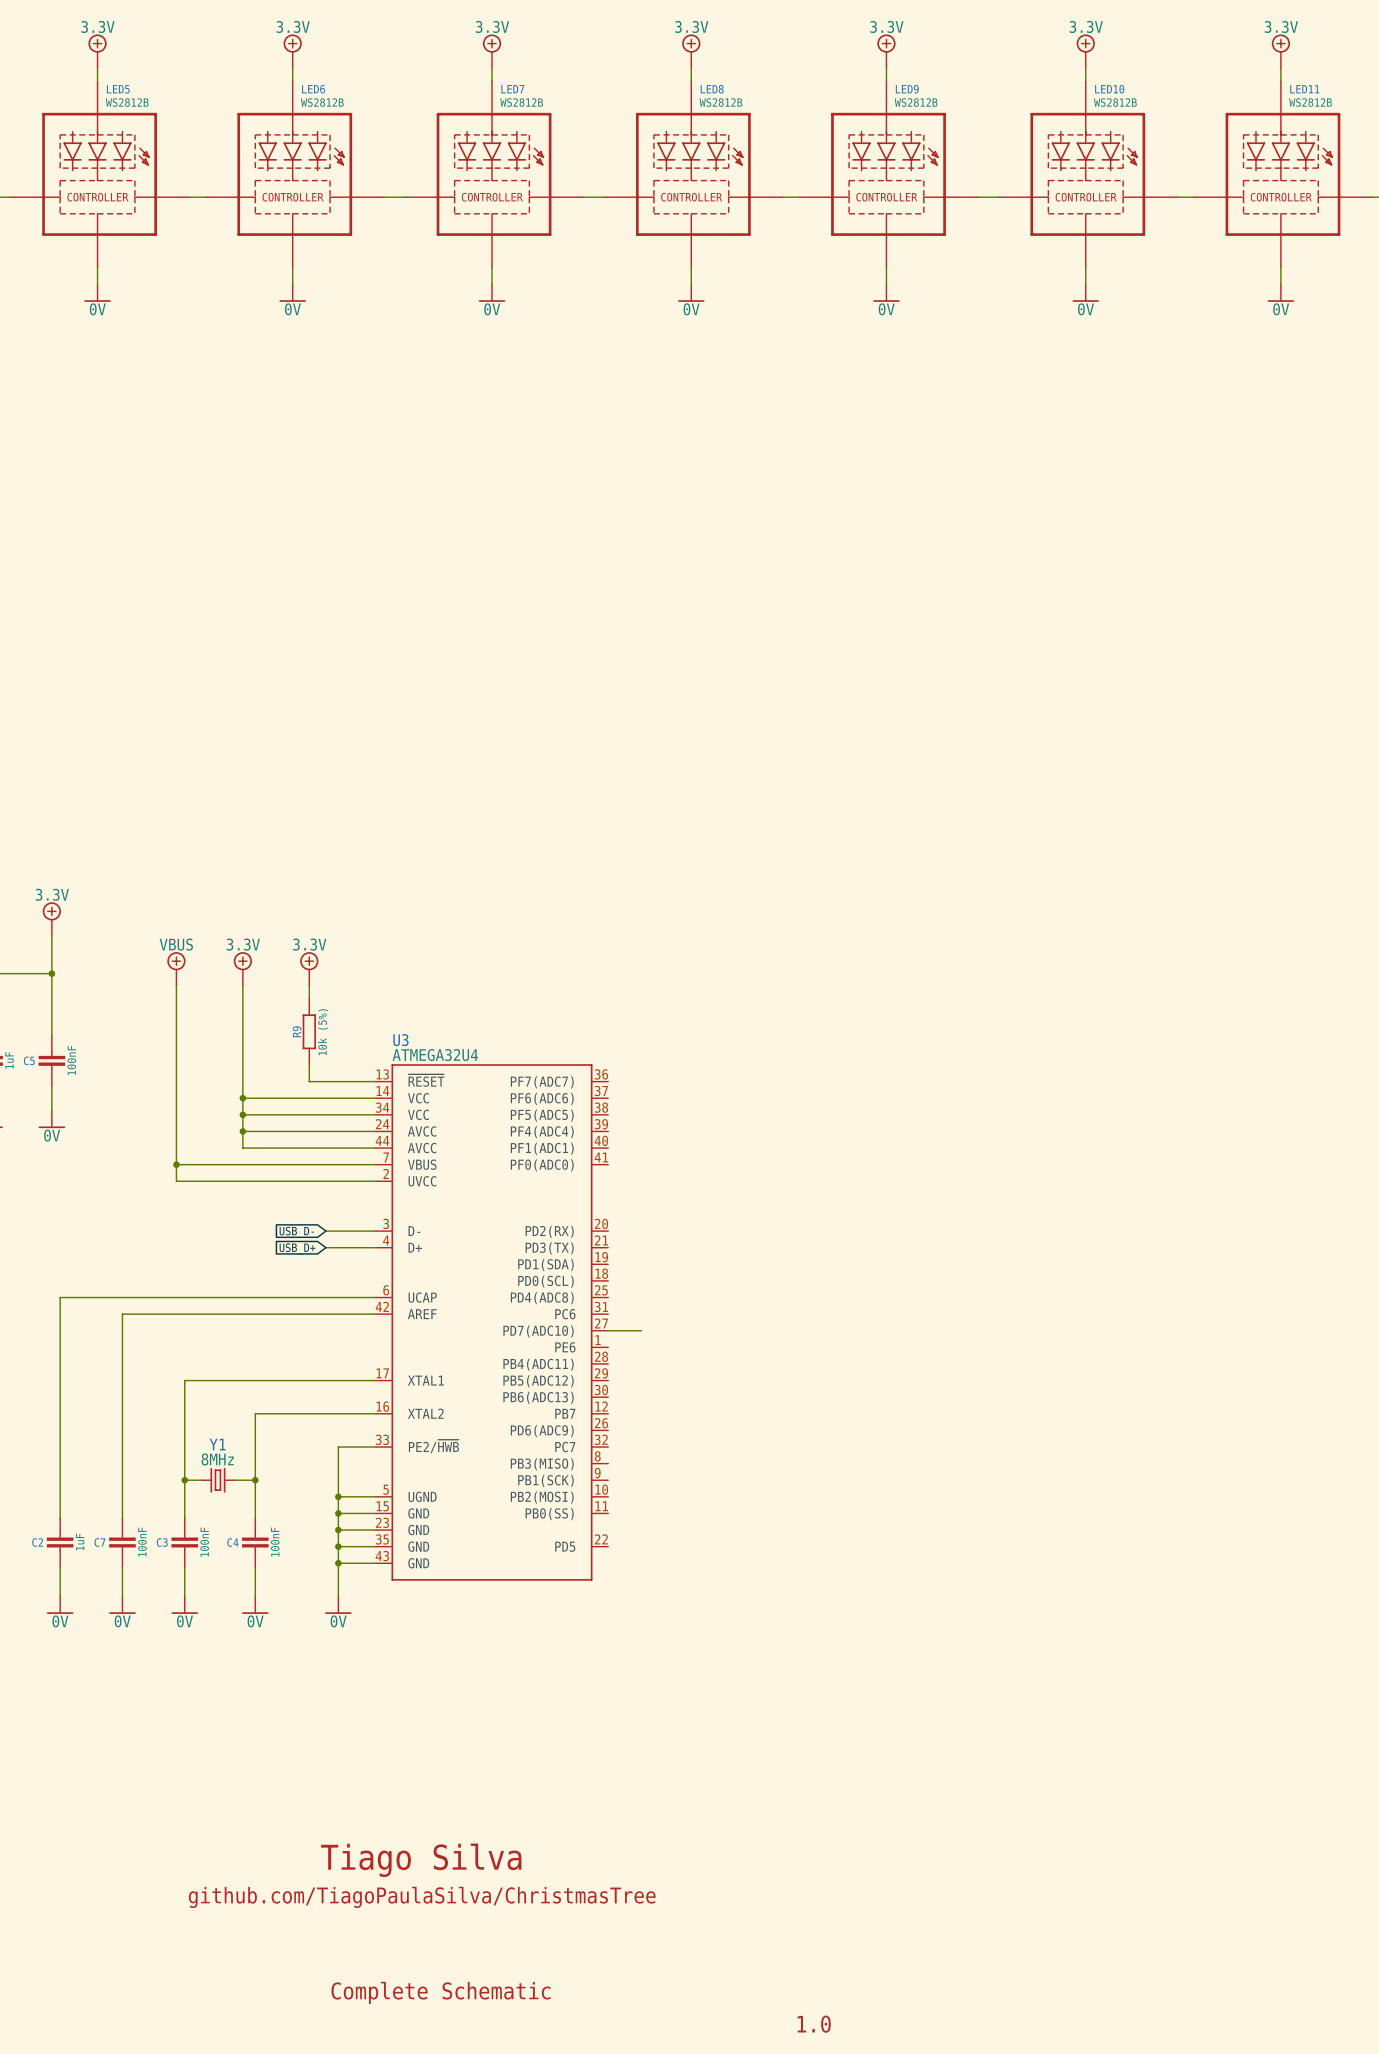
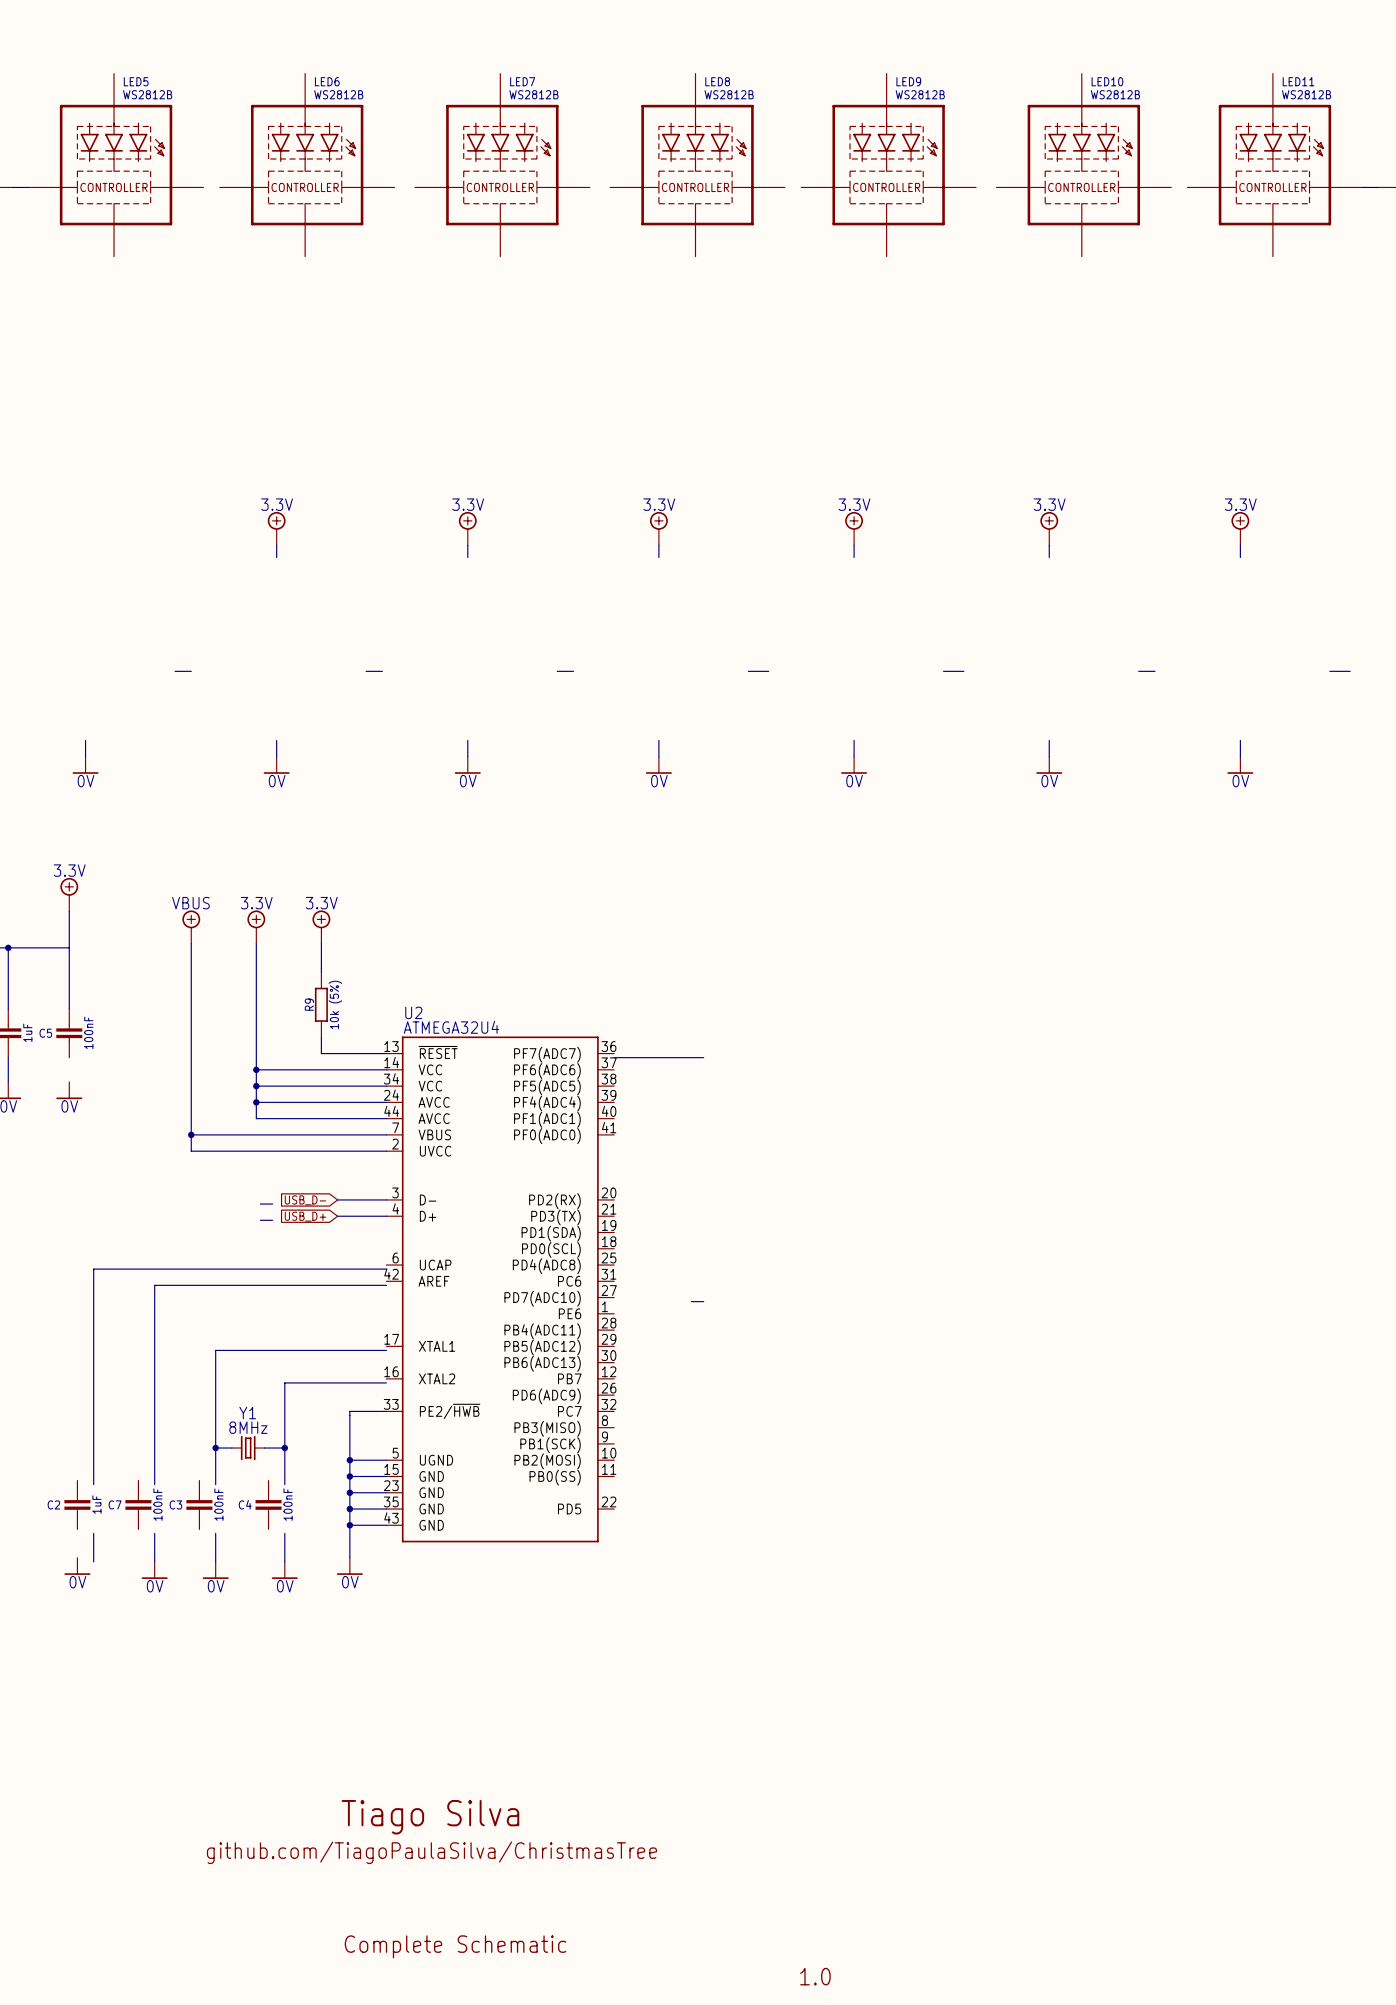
power symbol: 3.3V (97, 51) -> none
power symbol: 3.3V (292, 51) -> none
power symbol: 3.3V (491, 51) -> none
power symbol: 3.3V (691, 51) -> none
power symbol: 3.3V (886, 51) -> none
power symbol: 3.3V (1085, 51) -> none
power symbol: 3.3V (1280, 51) -> none
wire: (97, 68) (97, 80) -> none
wire: (292, 68) (292, 80) -> none
wire: (491, 68) (491, 80) -> none
wire: (691, 68) (691, 80) -> none
wire: (886, 68) (886, 80) -> none
wire: (1085, 68) (1085, 80) -> none
wire: (1280, 68) (1280, 80) -> none
wire: (188, 197) (205, 197) -> none
wire: (384, 197) (404, 197) -> none
wire: (583, 197) (604, 197) -> none
wire: (782, 197) (799, 197) -> none
wire: (977, 197) (998, 197) -> none
wire: (1177, 197) (1193, 197) -> none
wire: (97, 267) (97, 284) -> none
wire: (292, 267) (292, 284) -> none
wire: (491, 267) (491, 284) -> none
wire: (691, 267) (691, 284) -> none
wire: (886, 267) (886, 284) -> none
wire: (1085, 267) (1085, 284) -> none
wire: (1280, 267) (1280, 284) -> none
power symbol: 0V (97, 293) -> none
power symbol: 0V (292, 293) -> none
power symbol: 0V (491, 293) -> none
power symbol: 0V (691, 293) -> none
power symbol: 0V (886, 293) -> none
power symbol: 0V (1085, 293) -> none
power symbol: 0V (1280, 293) -> none
power symbol: none -> 3.3V (276, 528)
power symbol: none -> 3.3V (467, 528)
power symbol: none -> 3.3V (658, 528)
power symbol: none -> 3.3V (854, 528)
power symbol: none -> 3.3V (1049, 528)
power symbol: none -> 3.3V (1240, 528)
wire: none -> (276, 545) (276, 557)
wire: none -> (467, 545) (467, 557)
wire: none -> (658, 545) (658, 557)
wire: none -> (854, 545) (854, 557)
wire: none -> (1049, 545) (1049, 557)
wire: none -> (1240, 545) (1240, 557)
wire: none -> (175, 671) (191, 671)
wire: none -> (366, 671) (382, 671)
wire: none -> (557, 671) (573, 671)
wire: none -> (748, 671) (768, 671)
wire: none -> (943, 671) (963, 671)
wire: none -> (1138, 671) (1154, 671)
wire: none -> (1329, 671) (1350, 671)
wire: none -> (85, 740) (85, 756)
wire: none -> (276, 740) (276, 756)
wire: none -> (467, 740) (467, 756)
wire: none -> (658, 740) (658, 756)
wire: none -> (854, 740) (854, 756)
wire: none -> (1049, 740) (1049, 756)
wire: none -> (1240, 740) (1240, 756)
power symbol: none -> 0V (85, 765)
power symbol: none -> 0V (276, 765)
power symbol: none -> 0V (467, 765)
power symbol: none -> 0V (658, 765)
power symbol: none -> 0V (854, 765)
power symbol: none -> 0V (1049, 765)
power symbol: none -> 0V (1240, 765)
power symbol position: VBUS (176, 969) -> VBUS (191, 927)
power symbol position: 3.3V (242, 969) -> 3.3V (256, 927)
power symbol position: 3.3V (309, 969) -> 3.3V (321, 927)
junction: (51, 973) -> none
U3 name: U3 (400, 1040) -> U2 (413, 1012)
wire: (51, 1085) (51, 1110) -> none
wire: none -> (614, 1057) (703, 1057)
wire: none -> (260, 1204) (272, 1204)
wire: none -> (260, 1220) (272, 1220)
wire: (375, 1297) (60, 1297) (60, 1517) -> none
wire: none -> (386, 1269) (93, 1269) (93, 1484)
wire: (375, 1314) (122, 1314) (122, 1517) -> none
wire: none -> (386, 1285) (154, 1285) (154, 1484)
wire: (608, 1330) (641, 1330) -> none
wire: none -> (691, 1301) (703, 1301)
wire: (375, 1380) (184, 1380) (184, 1517) -> none
wire: none -> (386, 1350) (215, 1350) (215, 1484)
wire: (375, 1413) (255, 1413) (255, 1517) -> none
wire: none -> (386, 1382) (284, 1382) (284, 1484)
wire: (184, 1480) (201, 1480) -> (215, 1448) (231, 1448)
junction position: (184, 1480) -> (215, 1448)
Y1 position: (217, 1480) -> (248, 1448)
wire: (234, 1480) (255, 1480) -> (264, 1448) (284, 1448)
junction position: (255, 1480) -> (284, 1448)
wire: (60, 1567) (60, 1596) -> (93, 1533) (93, 1561)
wire: (122, 1567) (122, 1596) -> (154, 1533) (154, 1561)
wire: (184, 1567) (184, 1596) -> (215, 1533) (215, 1561)
wire: (255, 1567) (255, 1596) -> (284, 1533) (284, 1561)
power symbol position: 0V (122, 1605) -> 0V (154, 1570)
power symbol position: 0V (184, 1605) -> 0V (215, 1570)
power symbol position: 0V (255, 1605) -> 0V (284, 1570)

